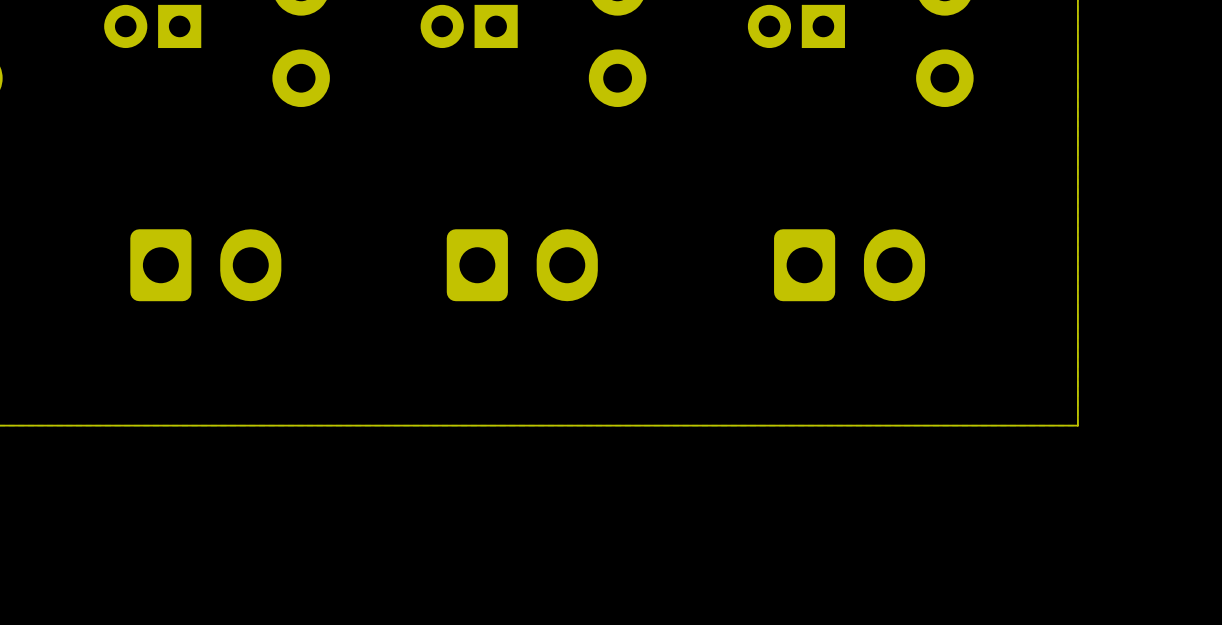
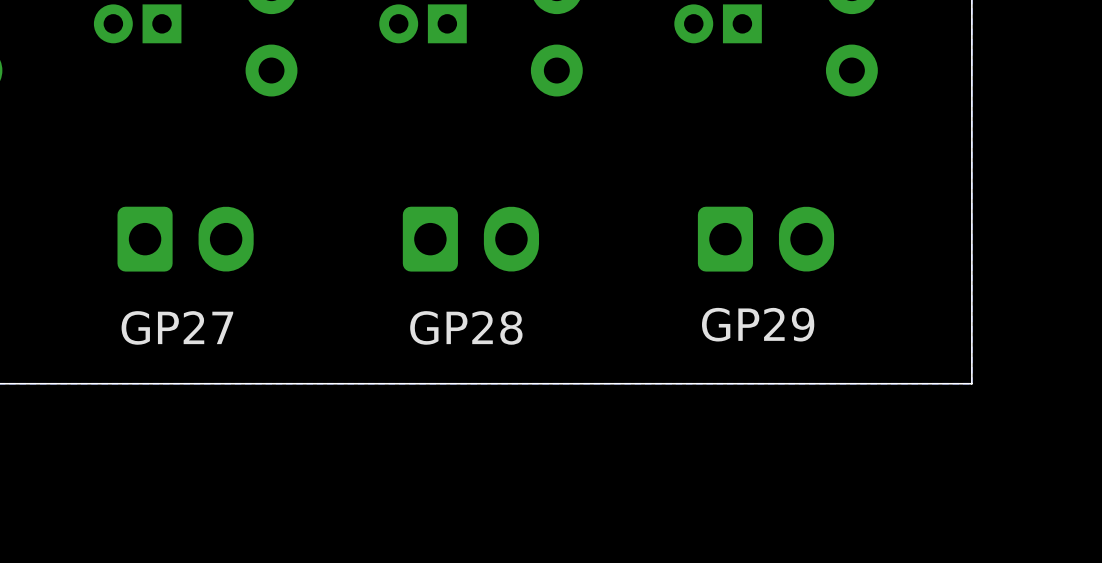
text: none -> GP29 (758, 324)
text: none -> GP27 (177, 327)
text: none -> GP28 (466, 327)

